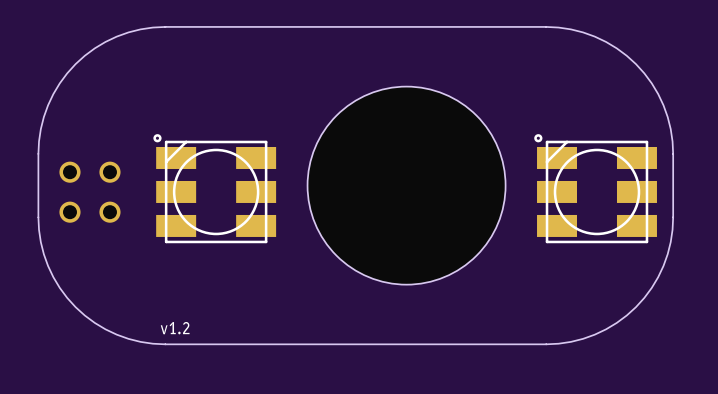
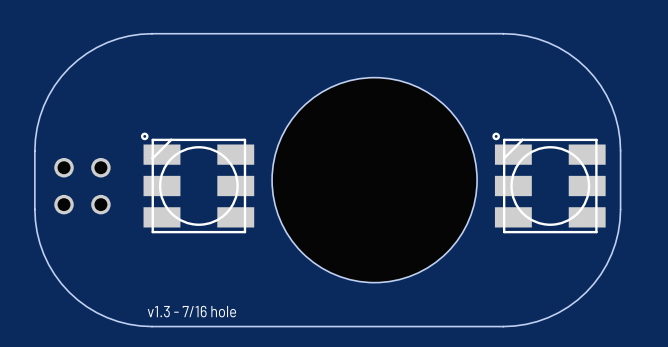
hole size: [307, 86, 506, 285] -> [272, 77, 478, 283]
text: v1.2 (175, 328) -> v1.3 - 7/16 hole (191, 311)

